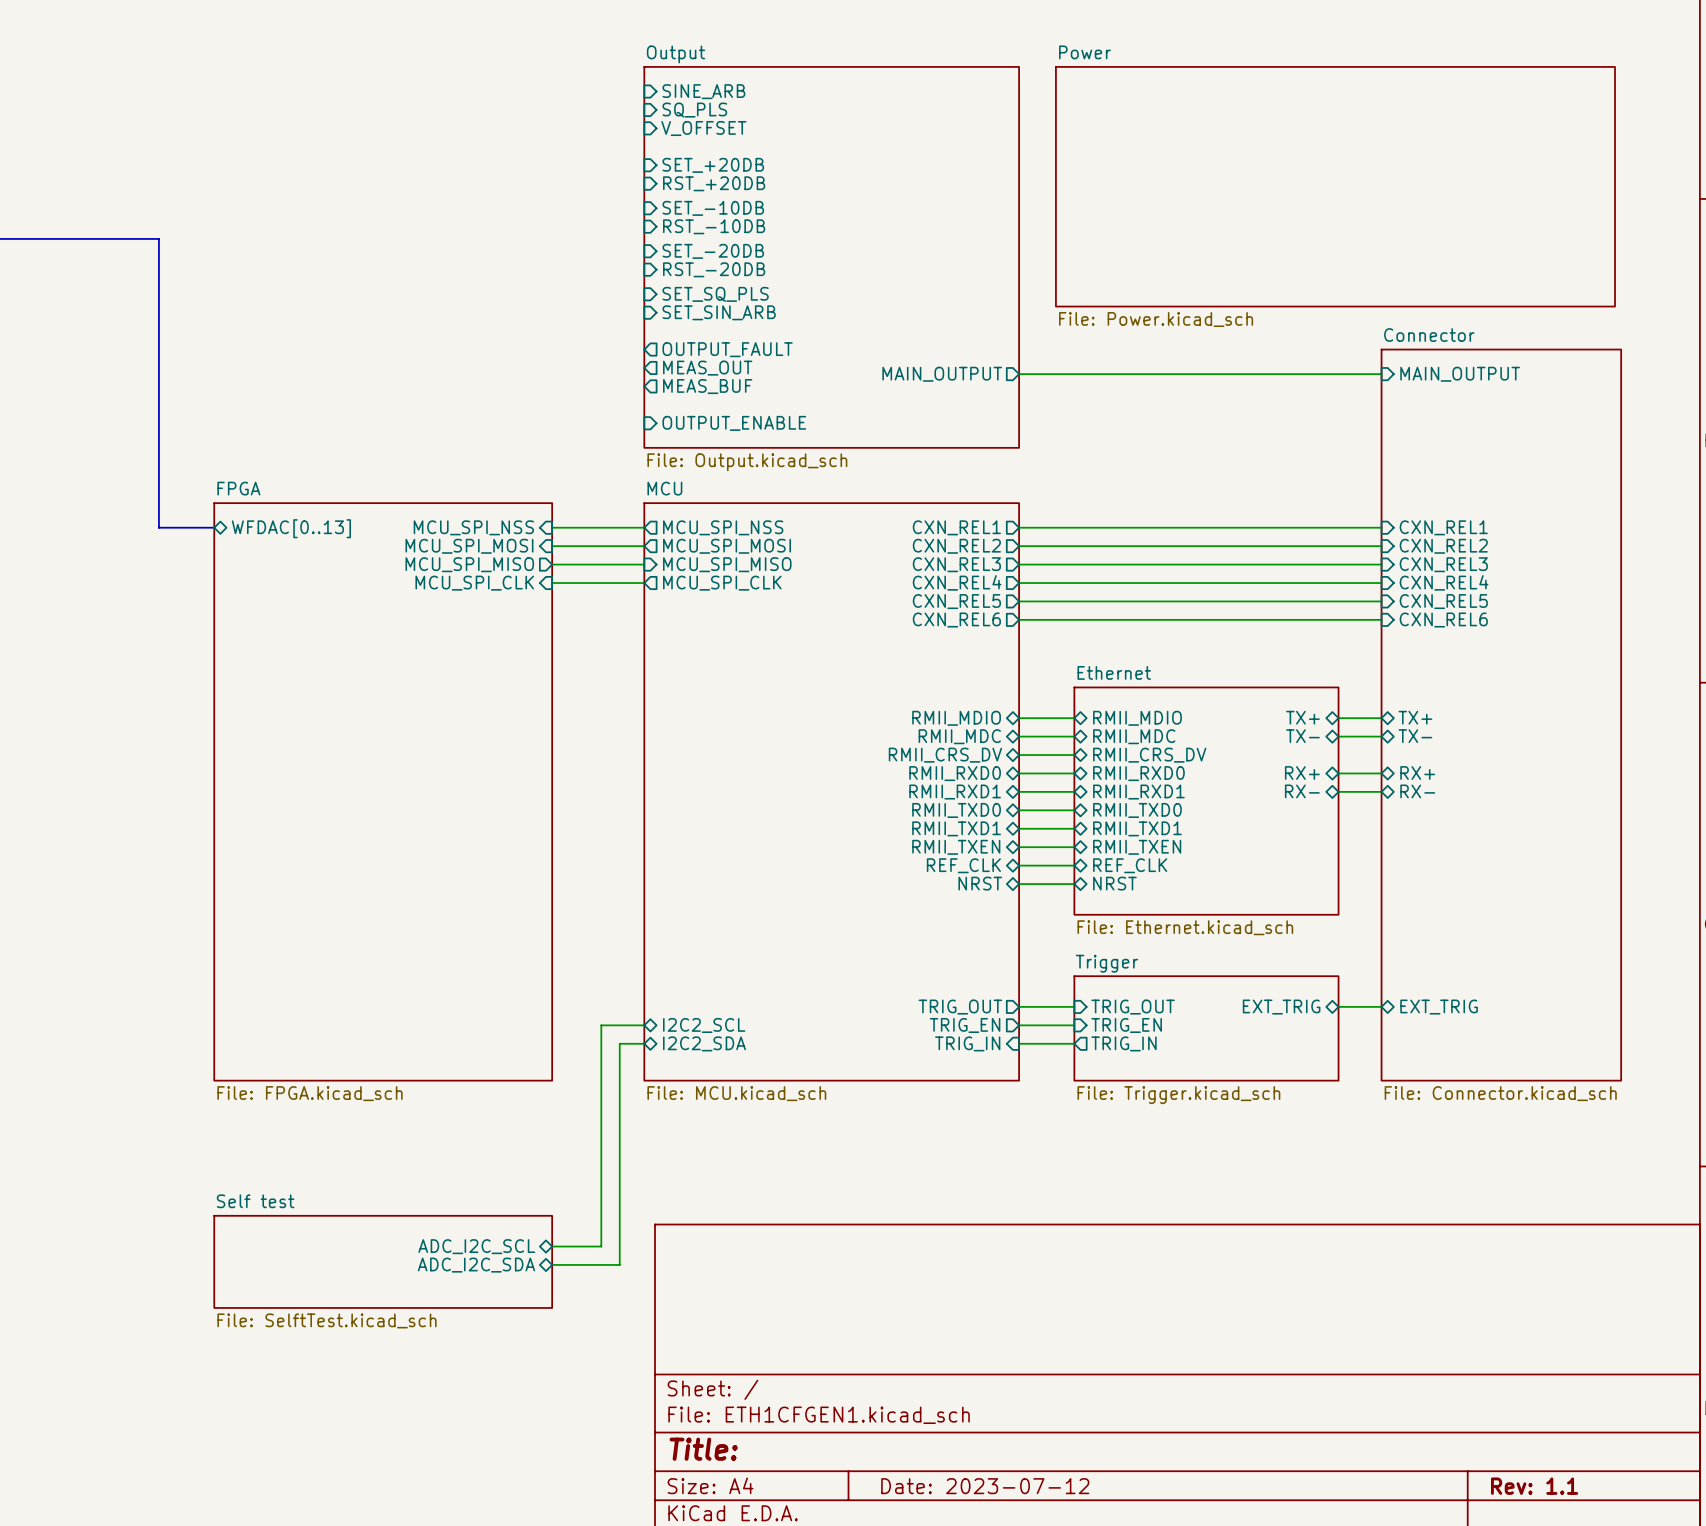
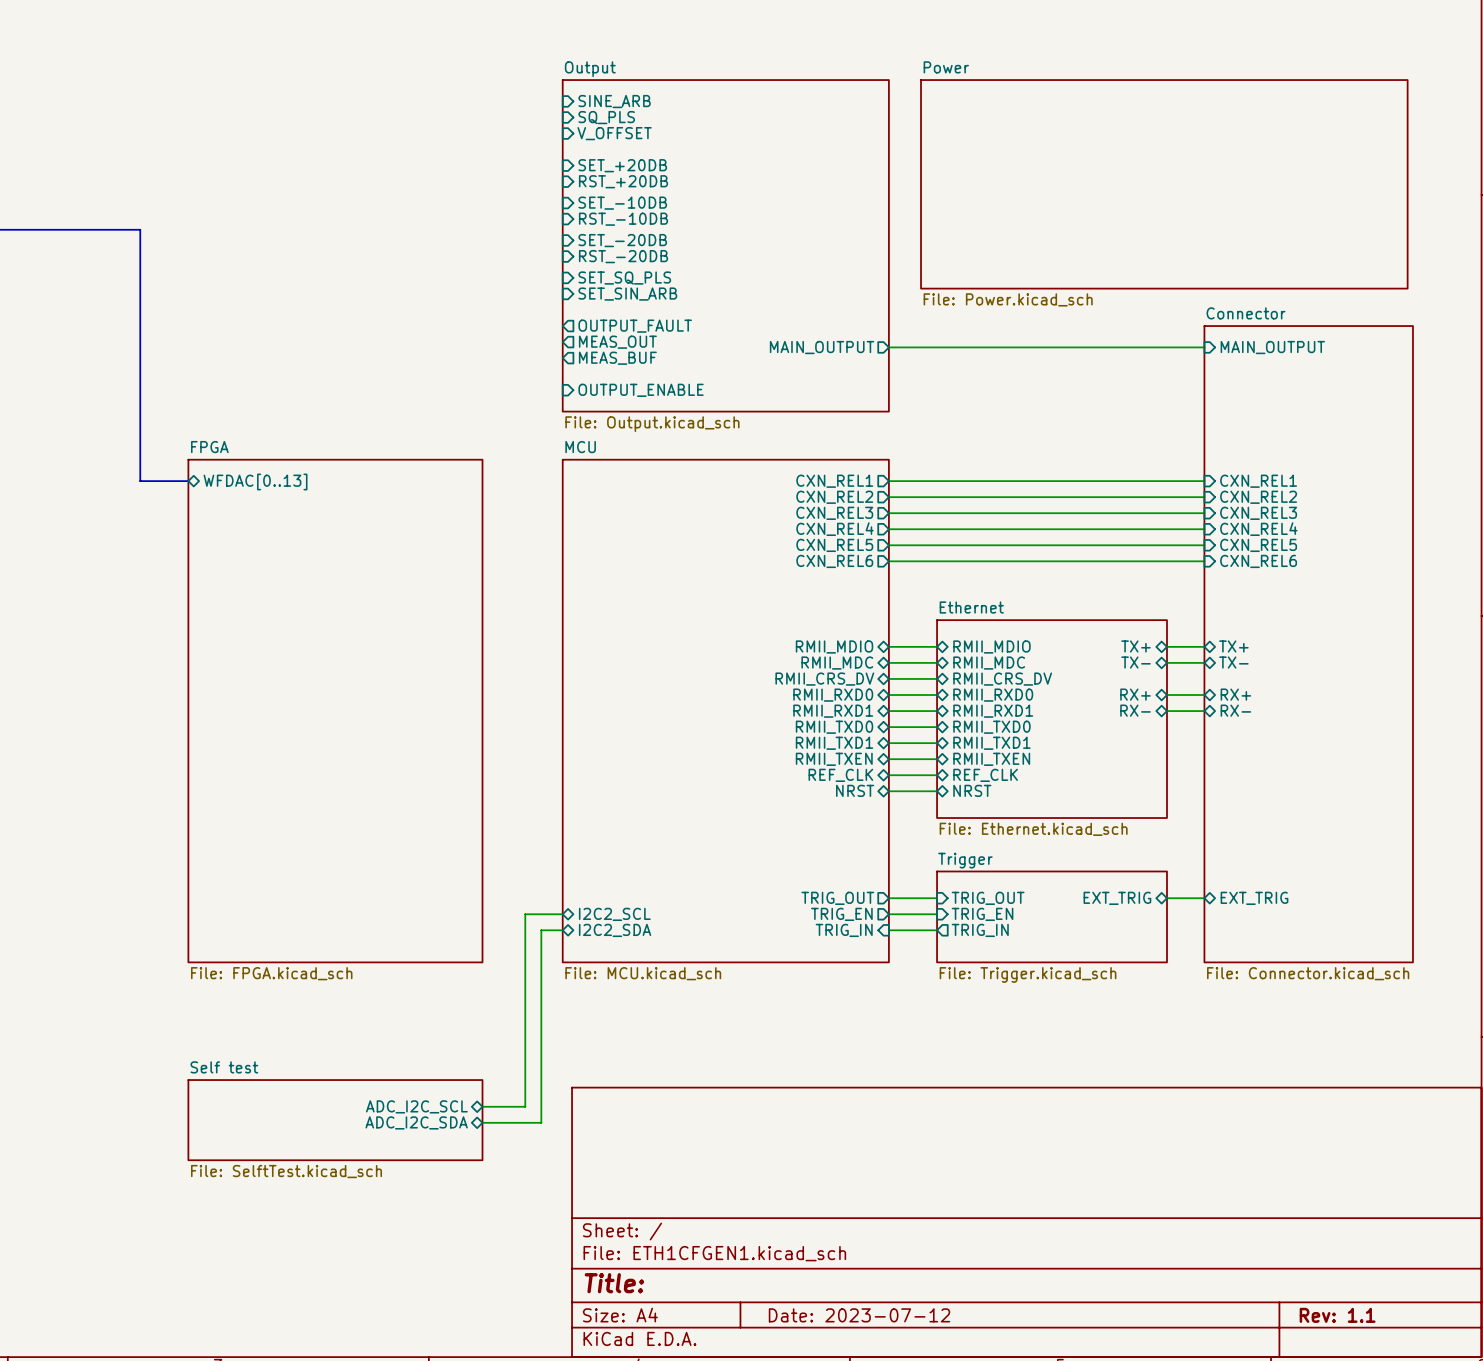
sheet pin: MCU_SPI_NSS (473, 527) -> none
wire: (552, 527) (644, 527) -> none
sheet pin: MCU_SPI_NSS (723, 527) -> none
sheet pin: MCU_SPI_MOSI (469, 546) -> none
wire: (552, 546) (644, 546) -> none
sheet pin: MCU_SPI_MOSI (727, 546) -> none
sheet pin: MCU_SPI_MISO (469, 564) -> none
wire: (552, 564) (644, 564) -> none
sheet pin: MCU_SPI_MISO (727, 564) -> none
sheet pin: MCU_SPI_CLK (474, 583) -> none
wire: (552, 583) (644, 583) -> none
sheet pin: MCU_SPI_CLK (722, 583) -> none

